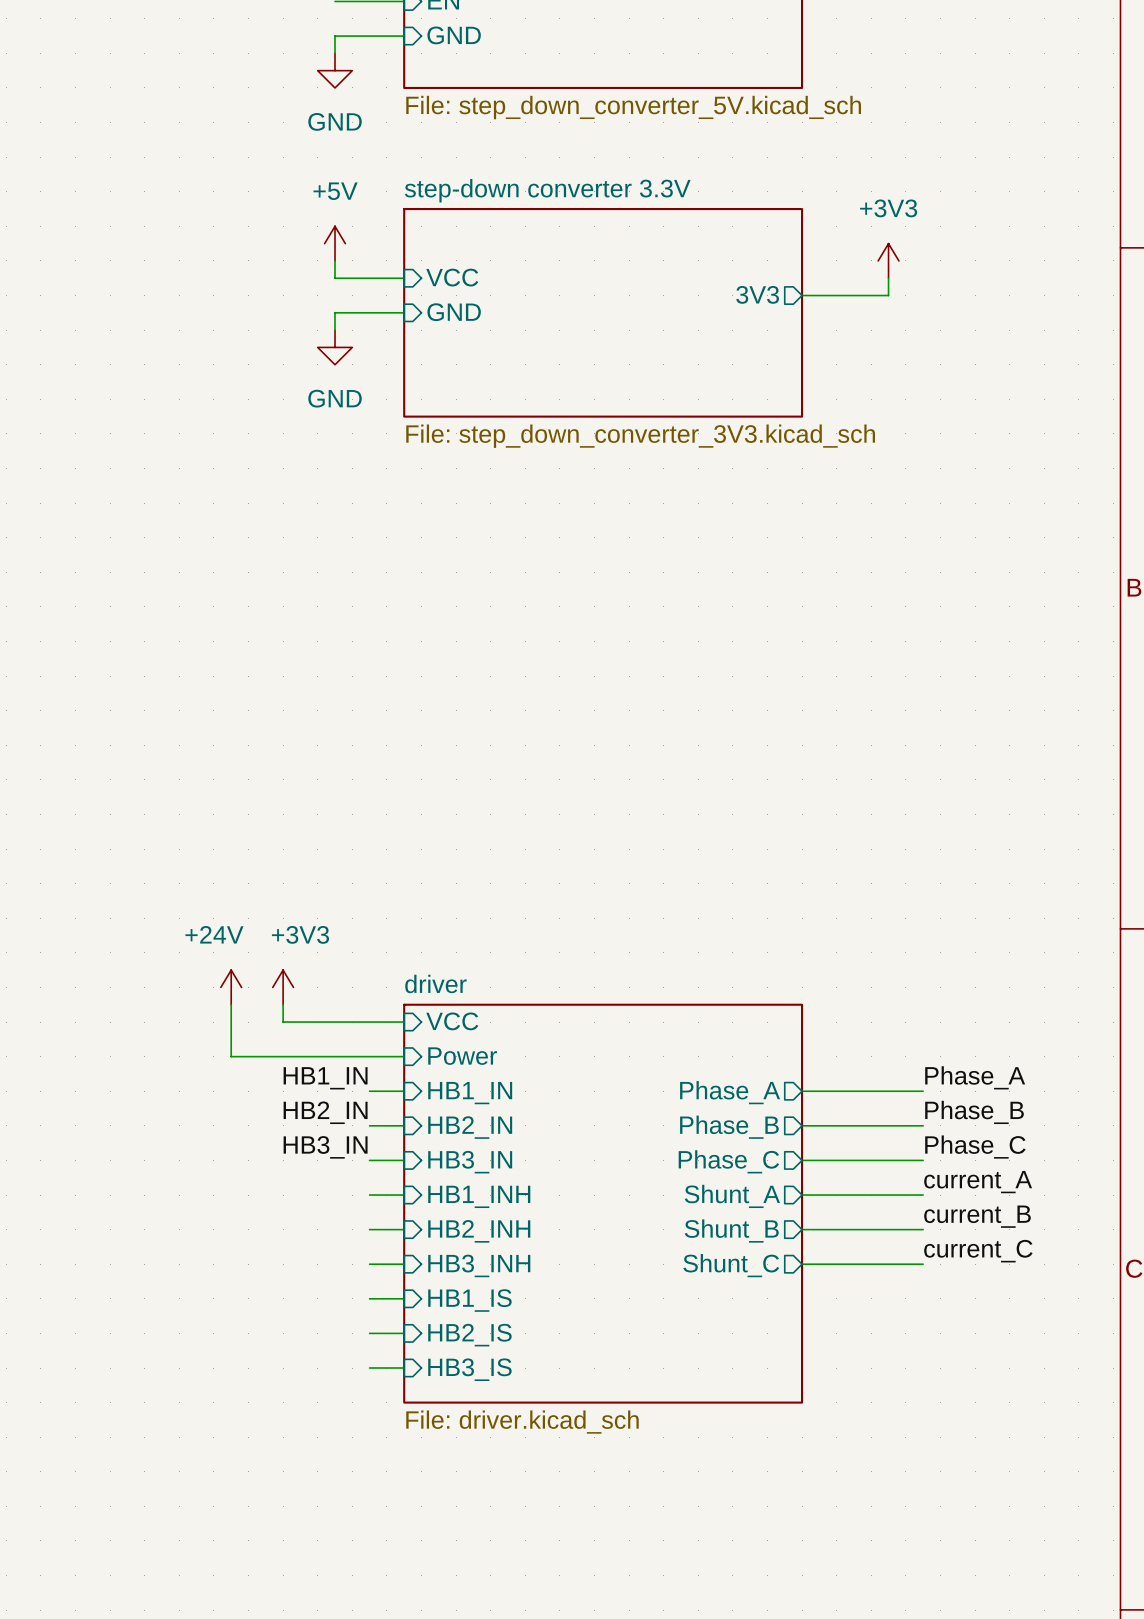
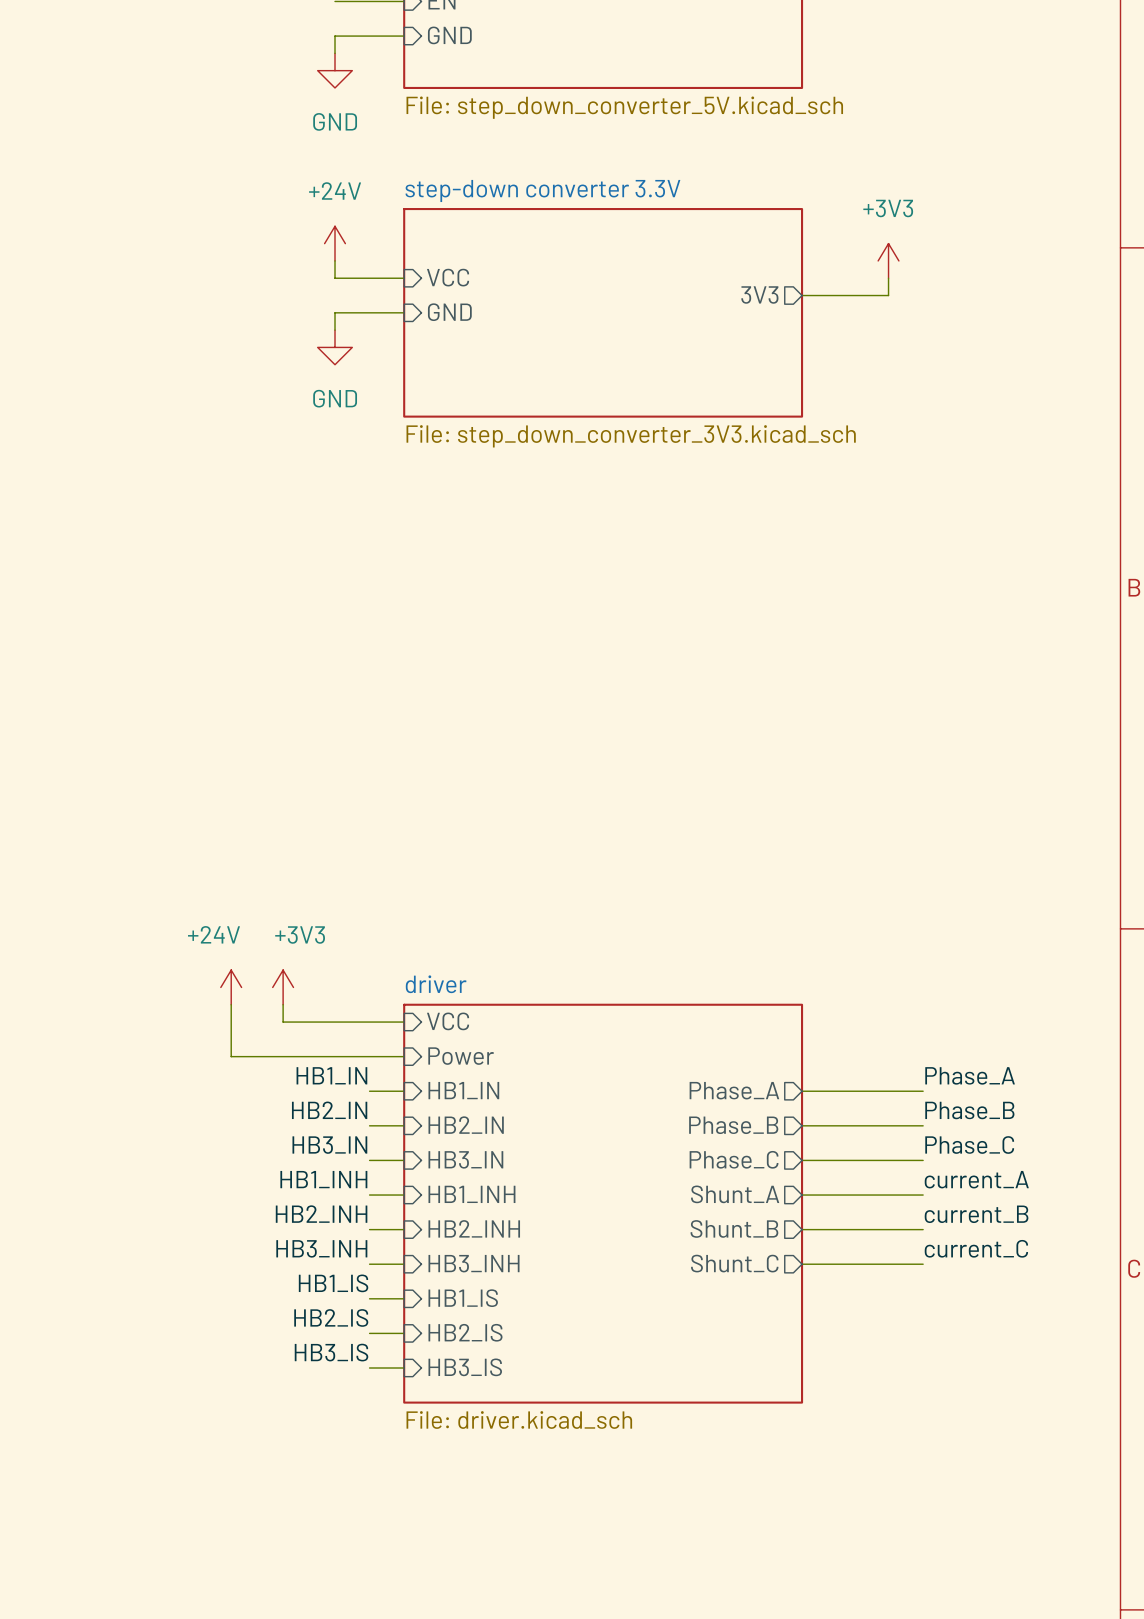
power symbol: +5V (335, 243) -> +24V (335, 243)
label: none -> HB1_INH (323, 1179)
label: none -> HB2_INH (321, 1214)
label: none -> HB3_INH (321, 1248)
label: none -> HB1_IS (333, 1283)
label: none -> HB2_IS (331, 1317)
label: none -> HB3_IS (331, 1352)

